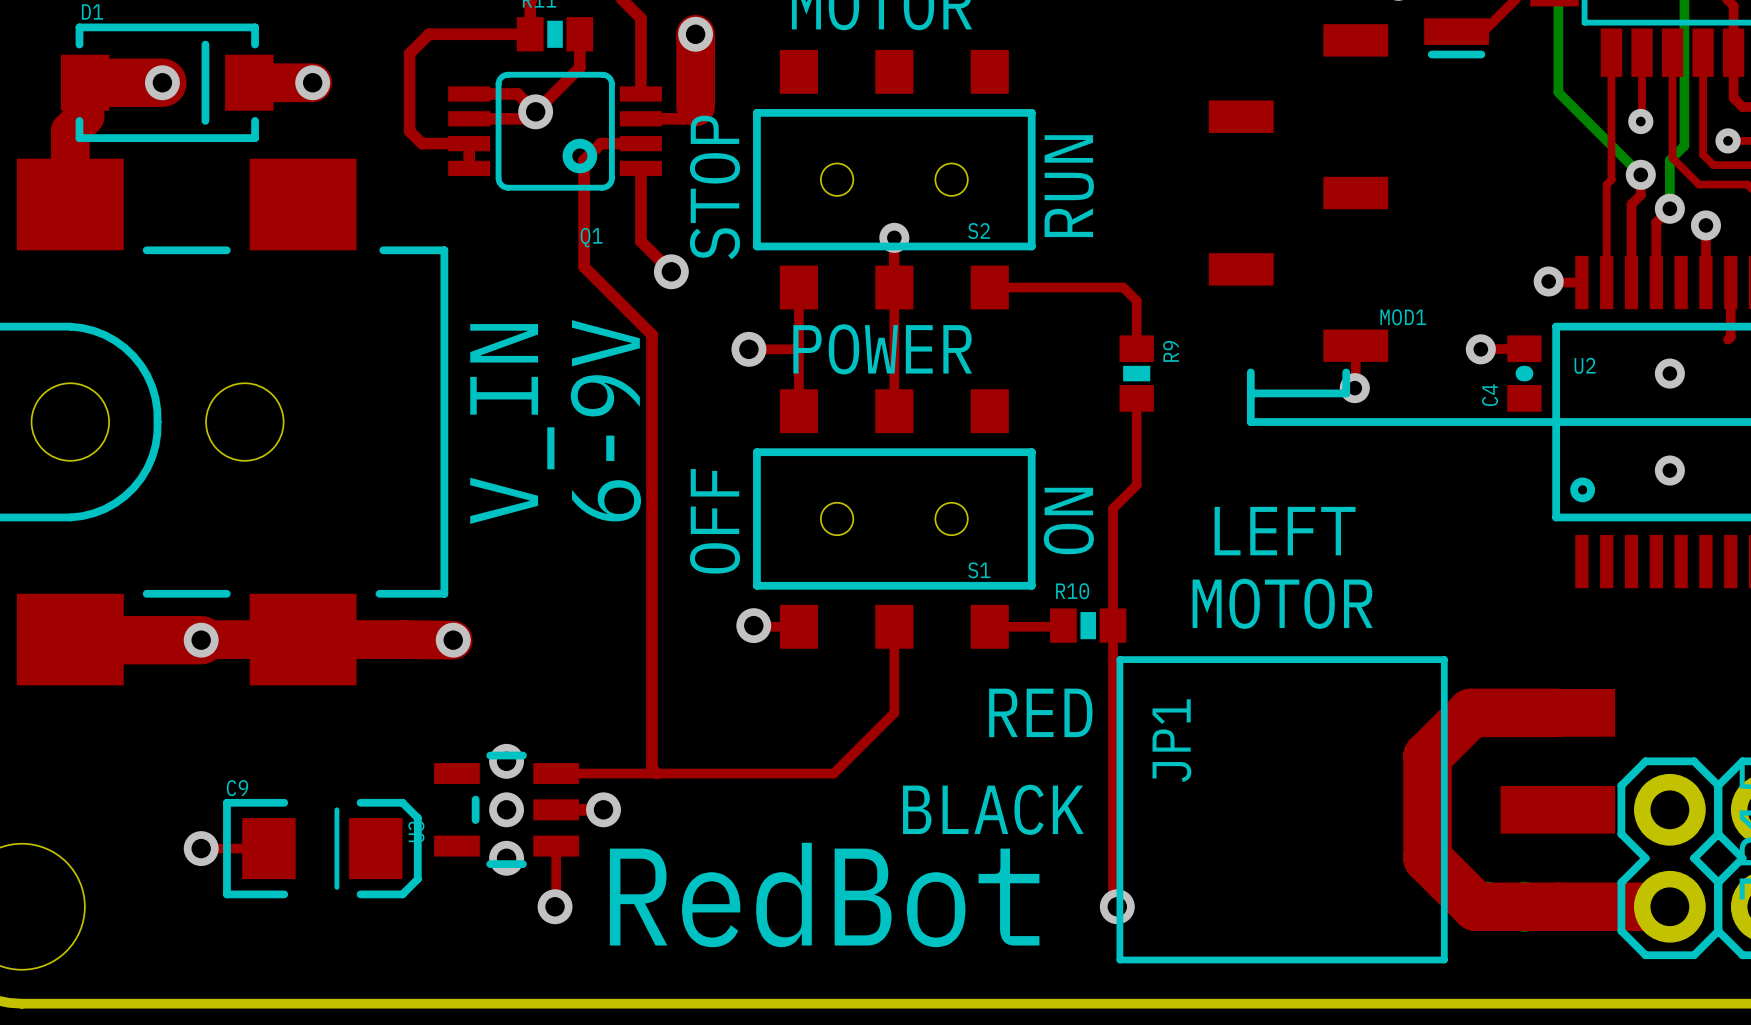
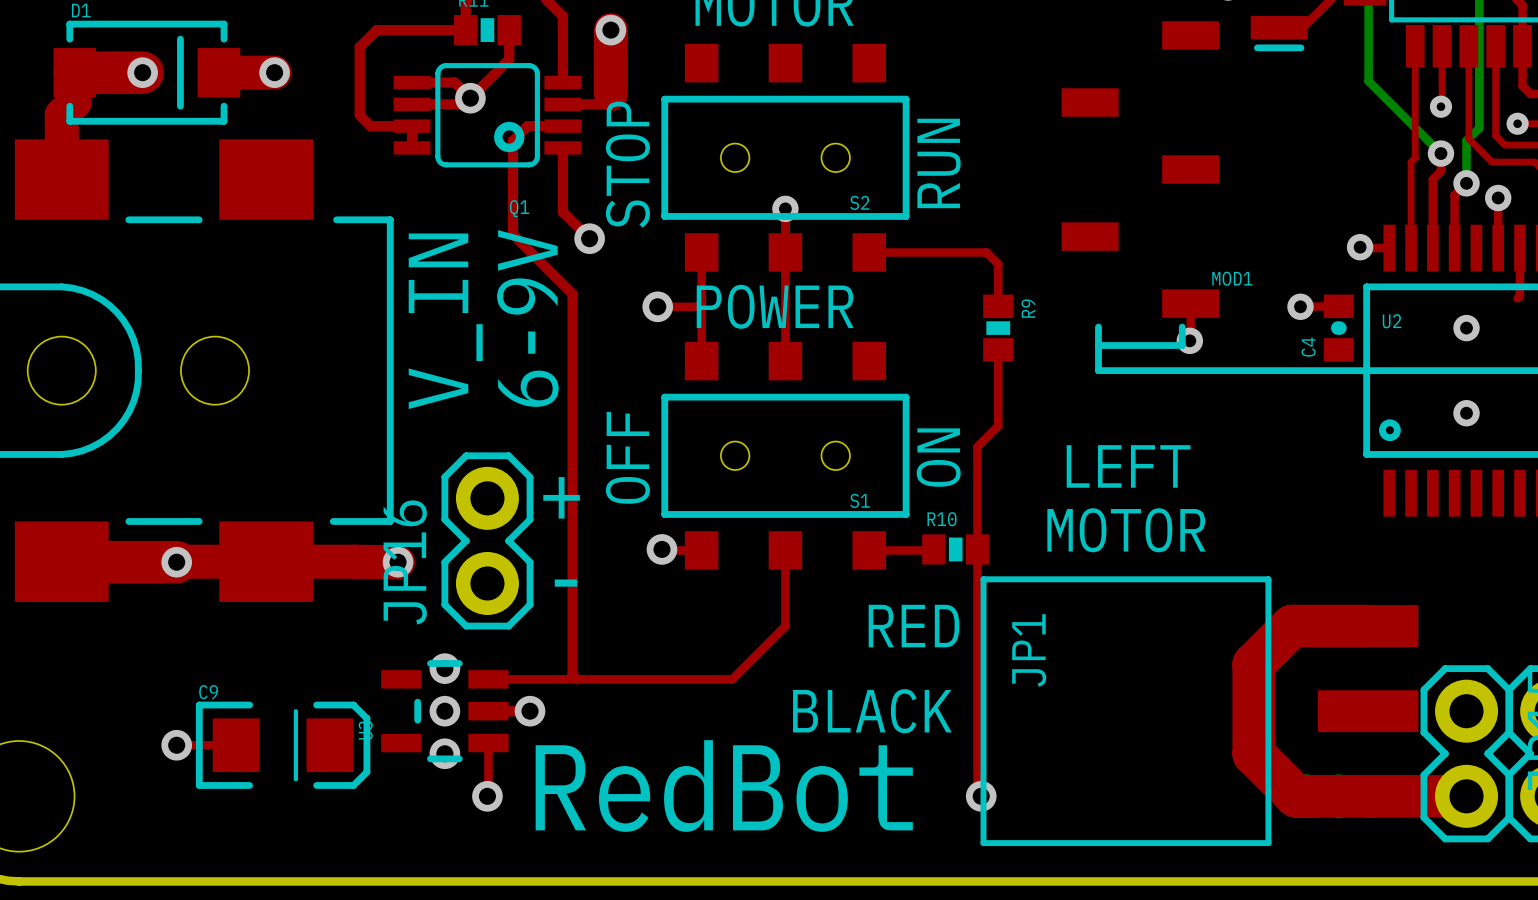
text position: 6-9V (605, 420) -> 6-9V (527, 318)
text position: V_IN (512, 423) -> V_IN (445, 321)
text: none -> + (561, 497)
JP16: none -> (487, 540)
text: none -> - (565, 583)

